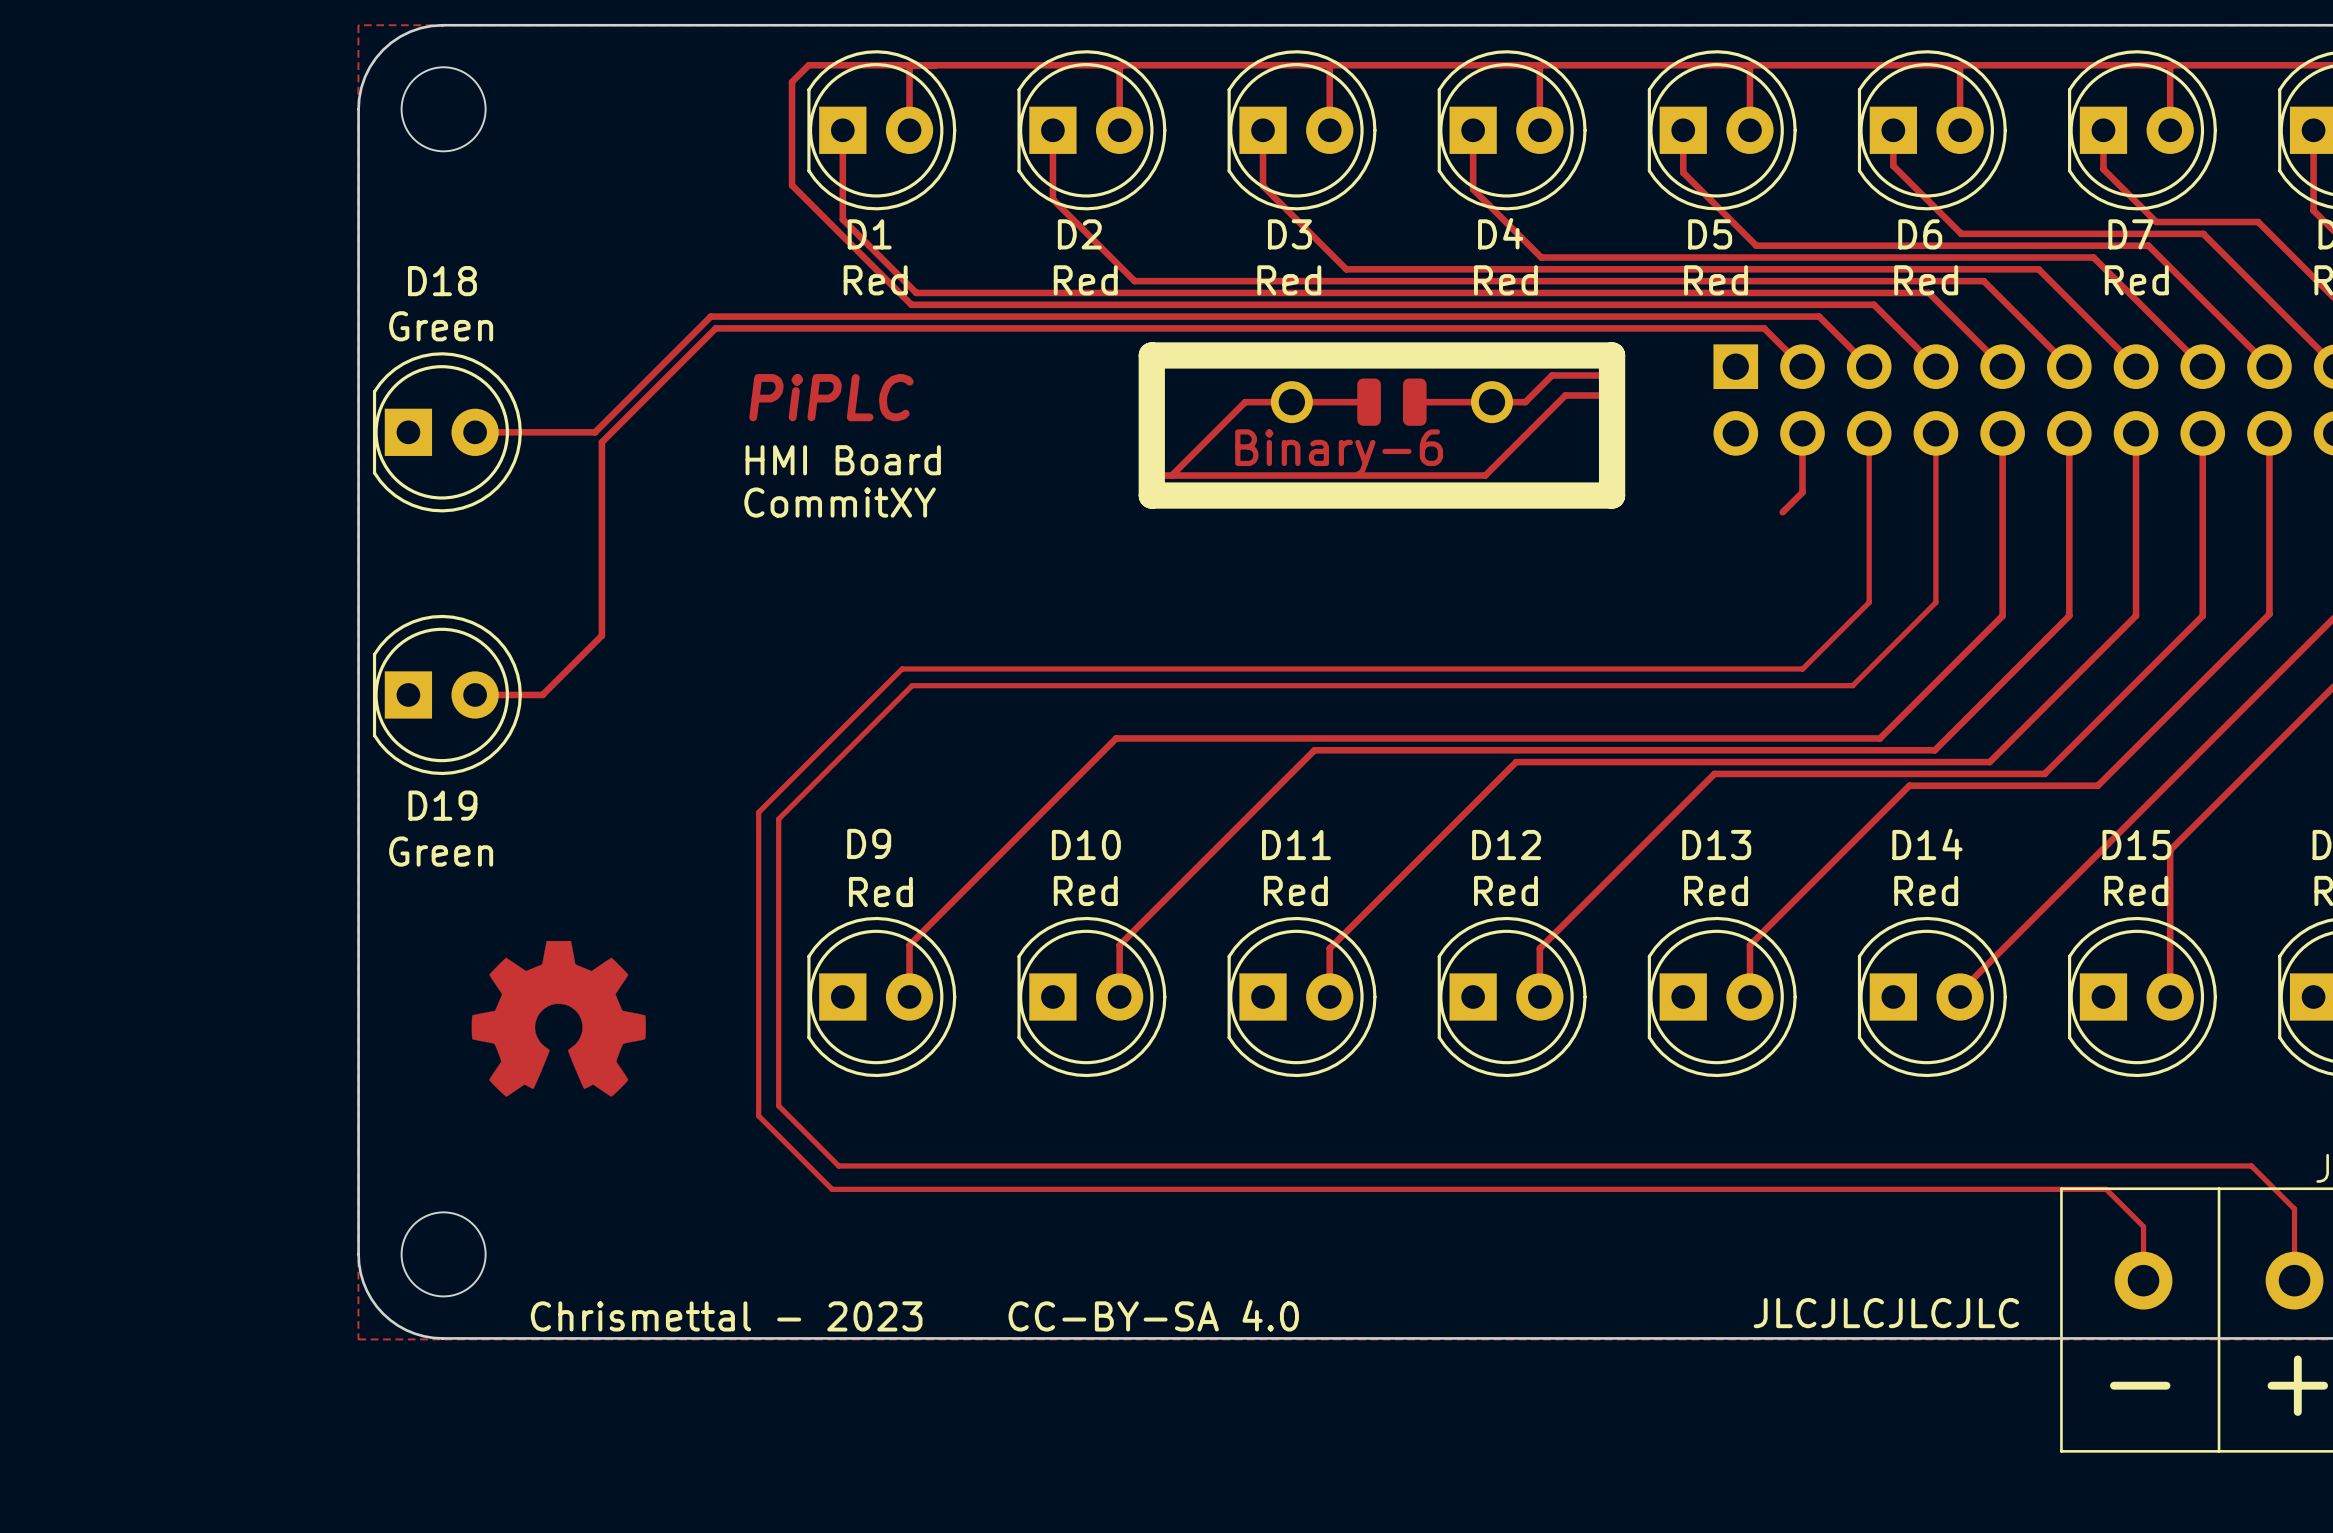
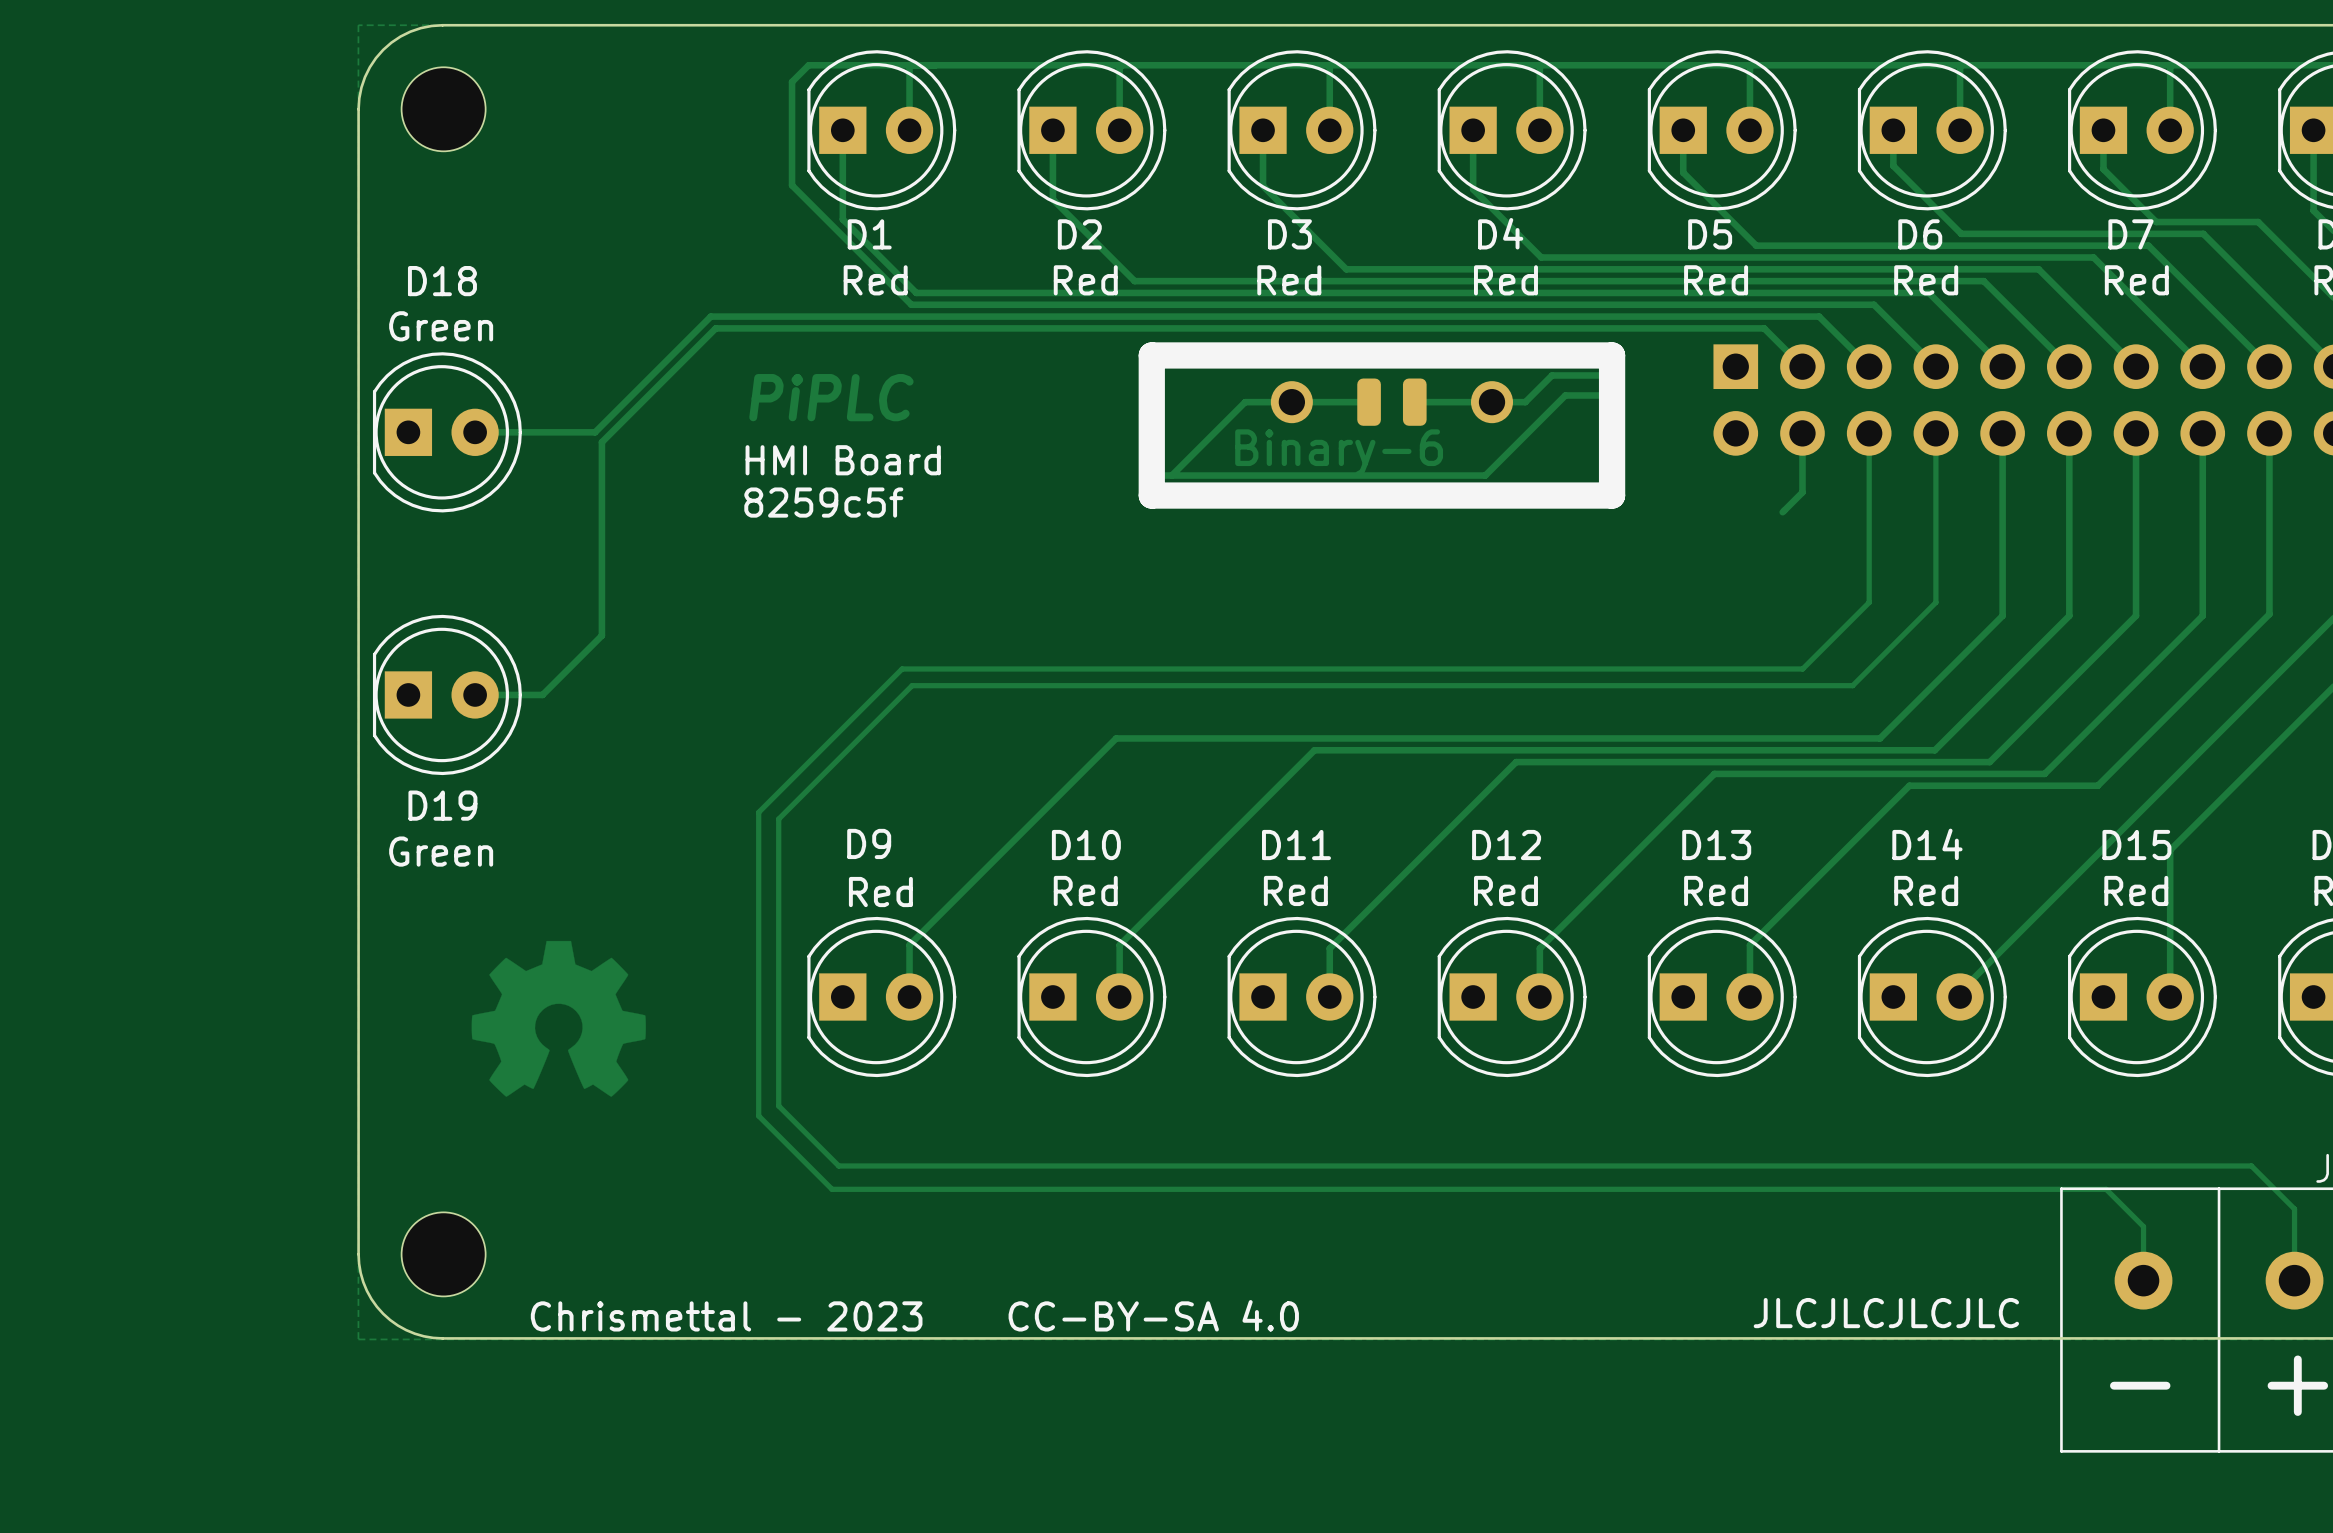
text: CommitXY (840, 502) -> 8259c5f (823, 502)

